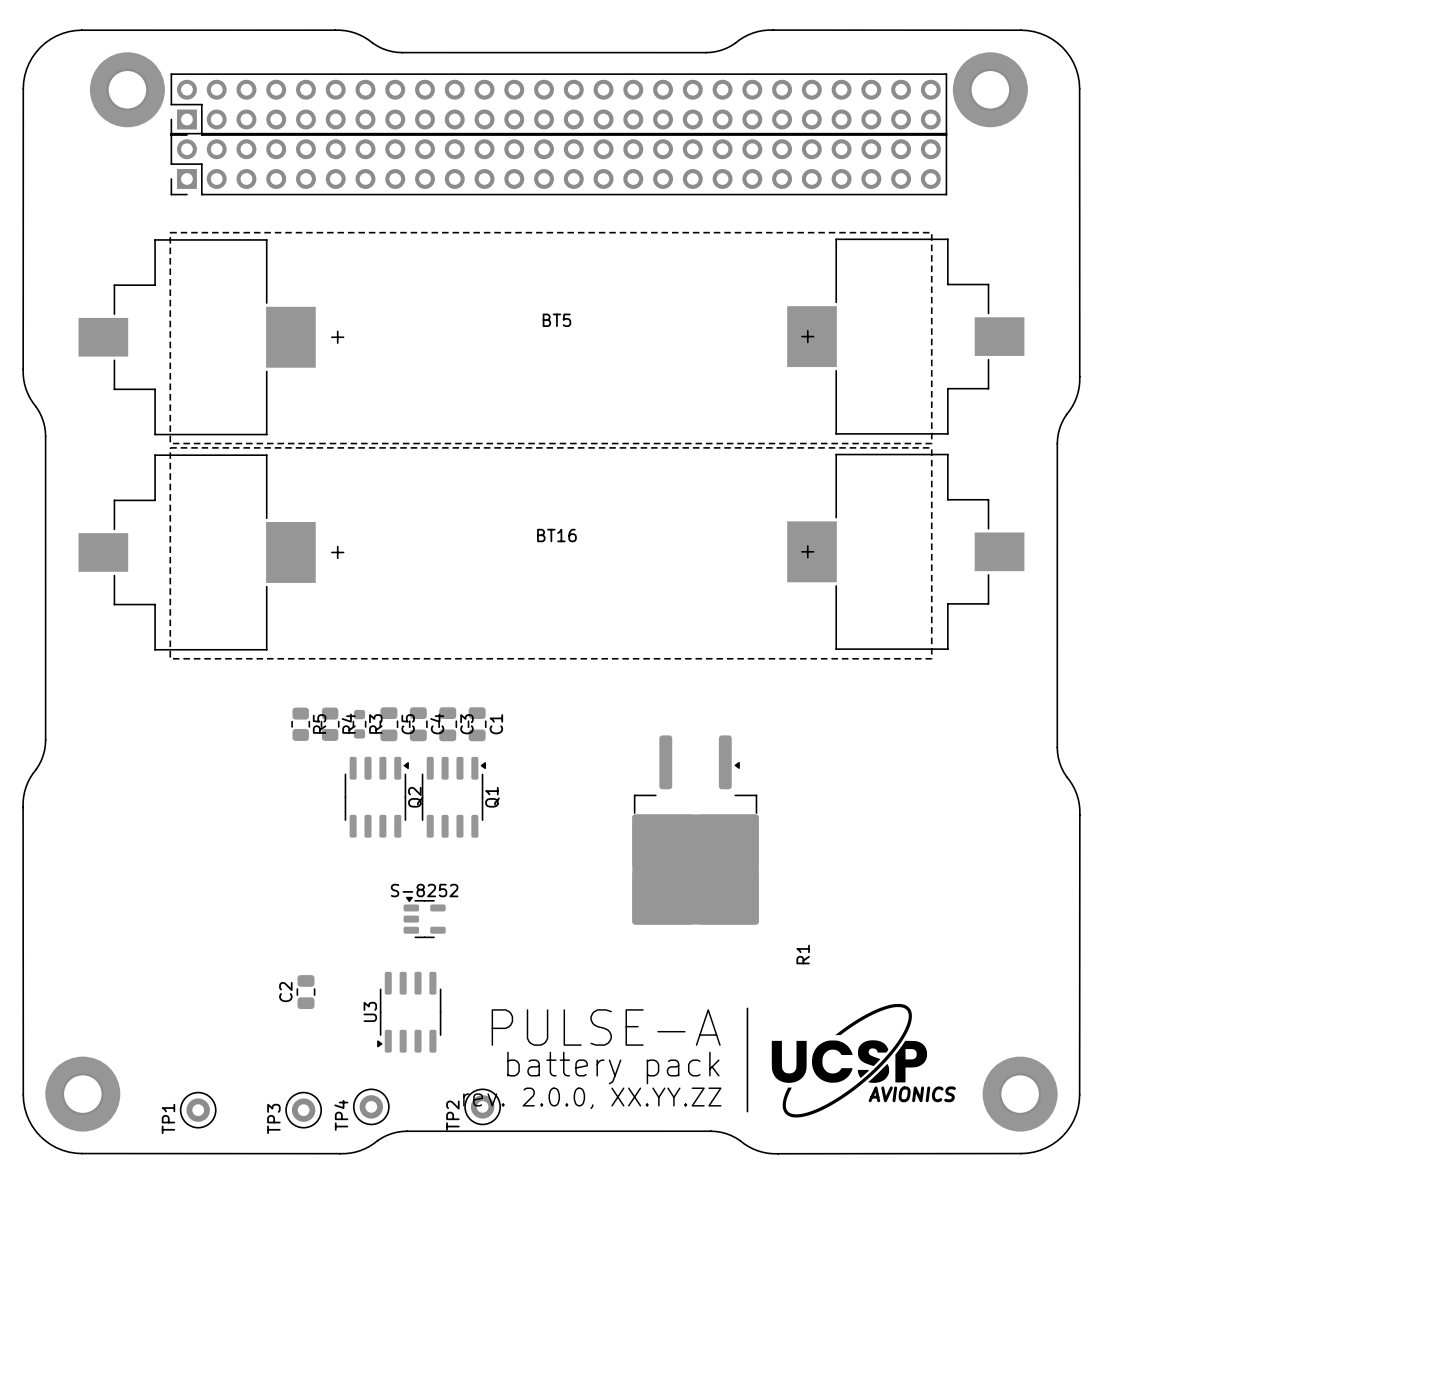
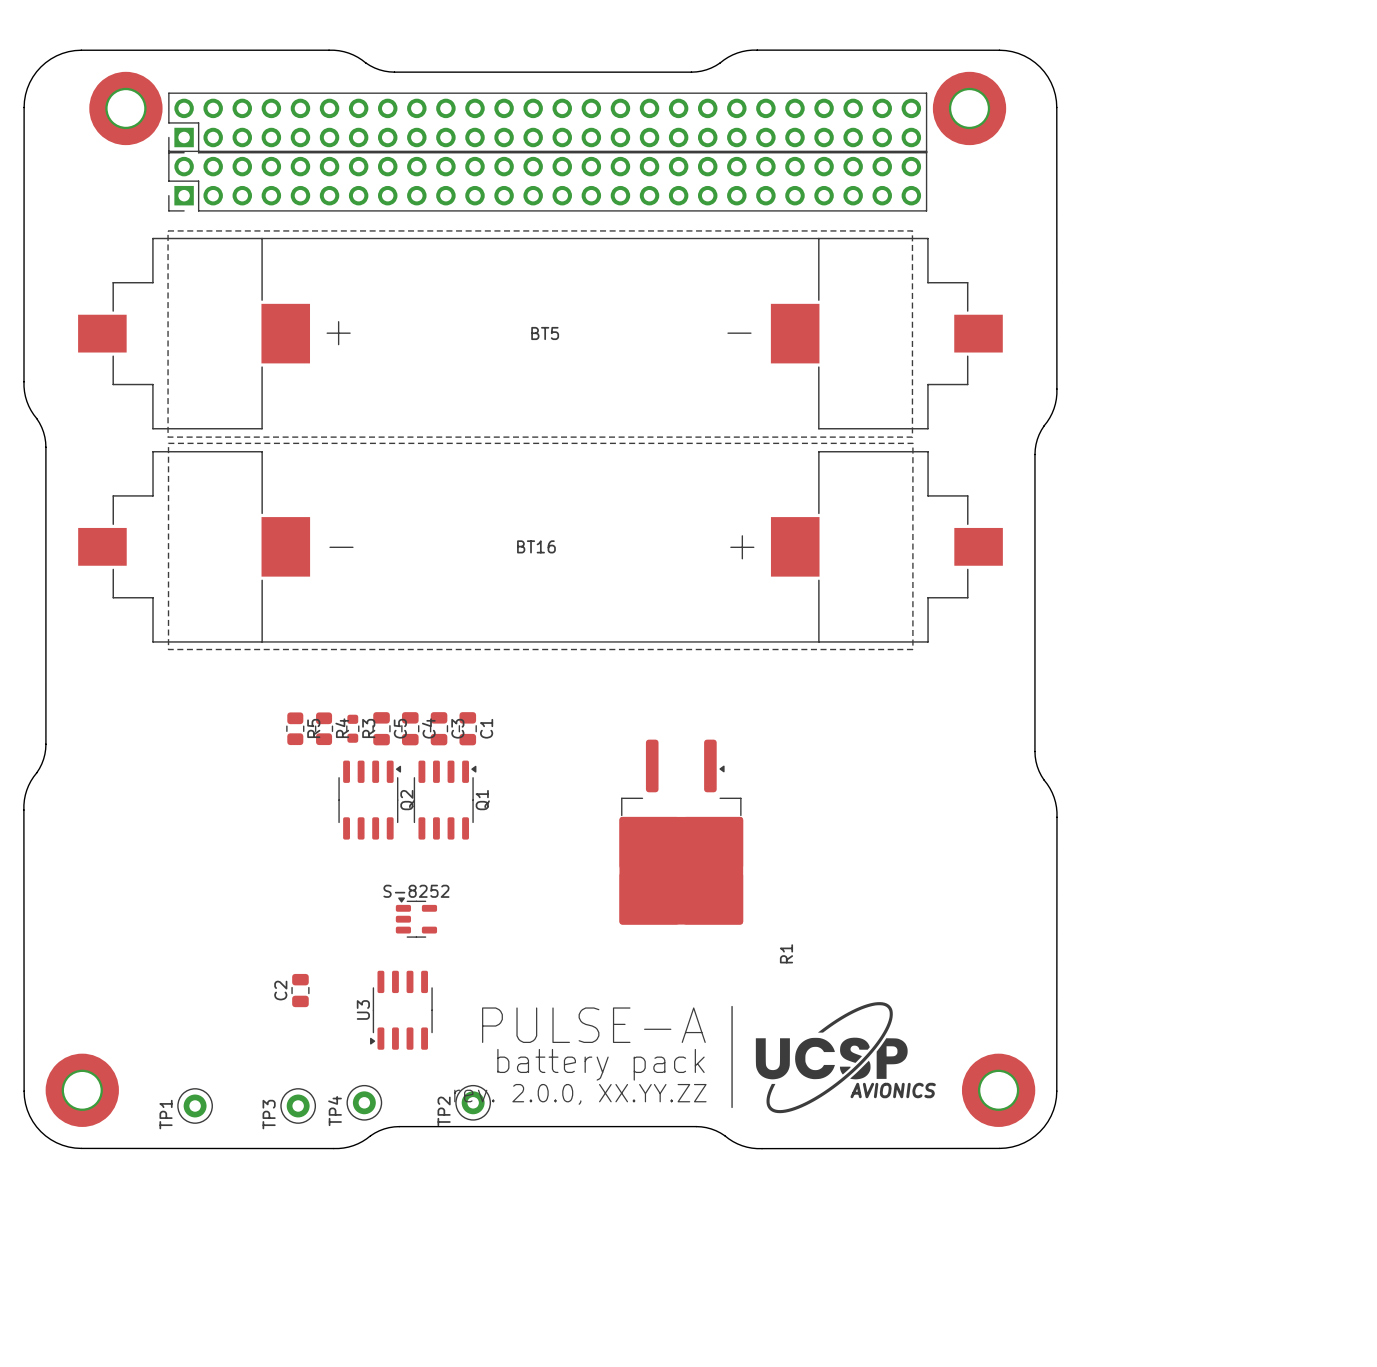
BT5 footprint: [78, 232, 1025, 445] -> [78, 230, 1003, 438]
BT16 footprint: [78, 447, 1025, 660] -> [78, 442, 1003, 651]

